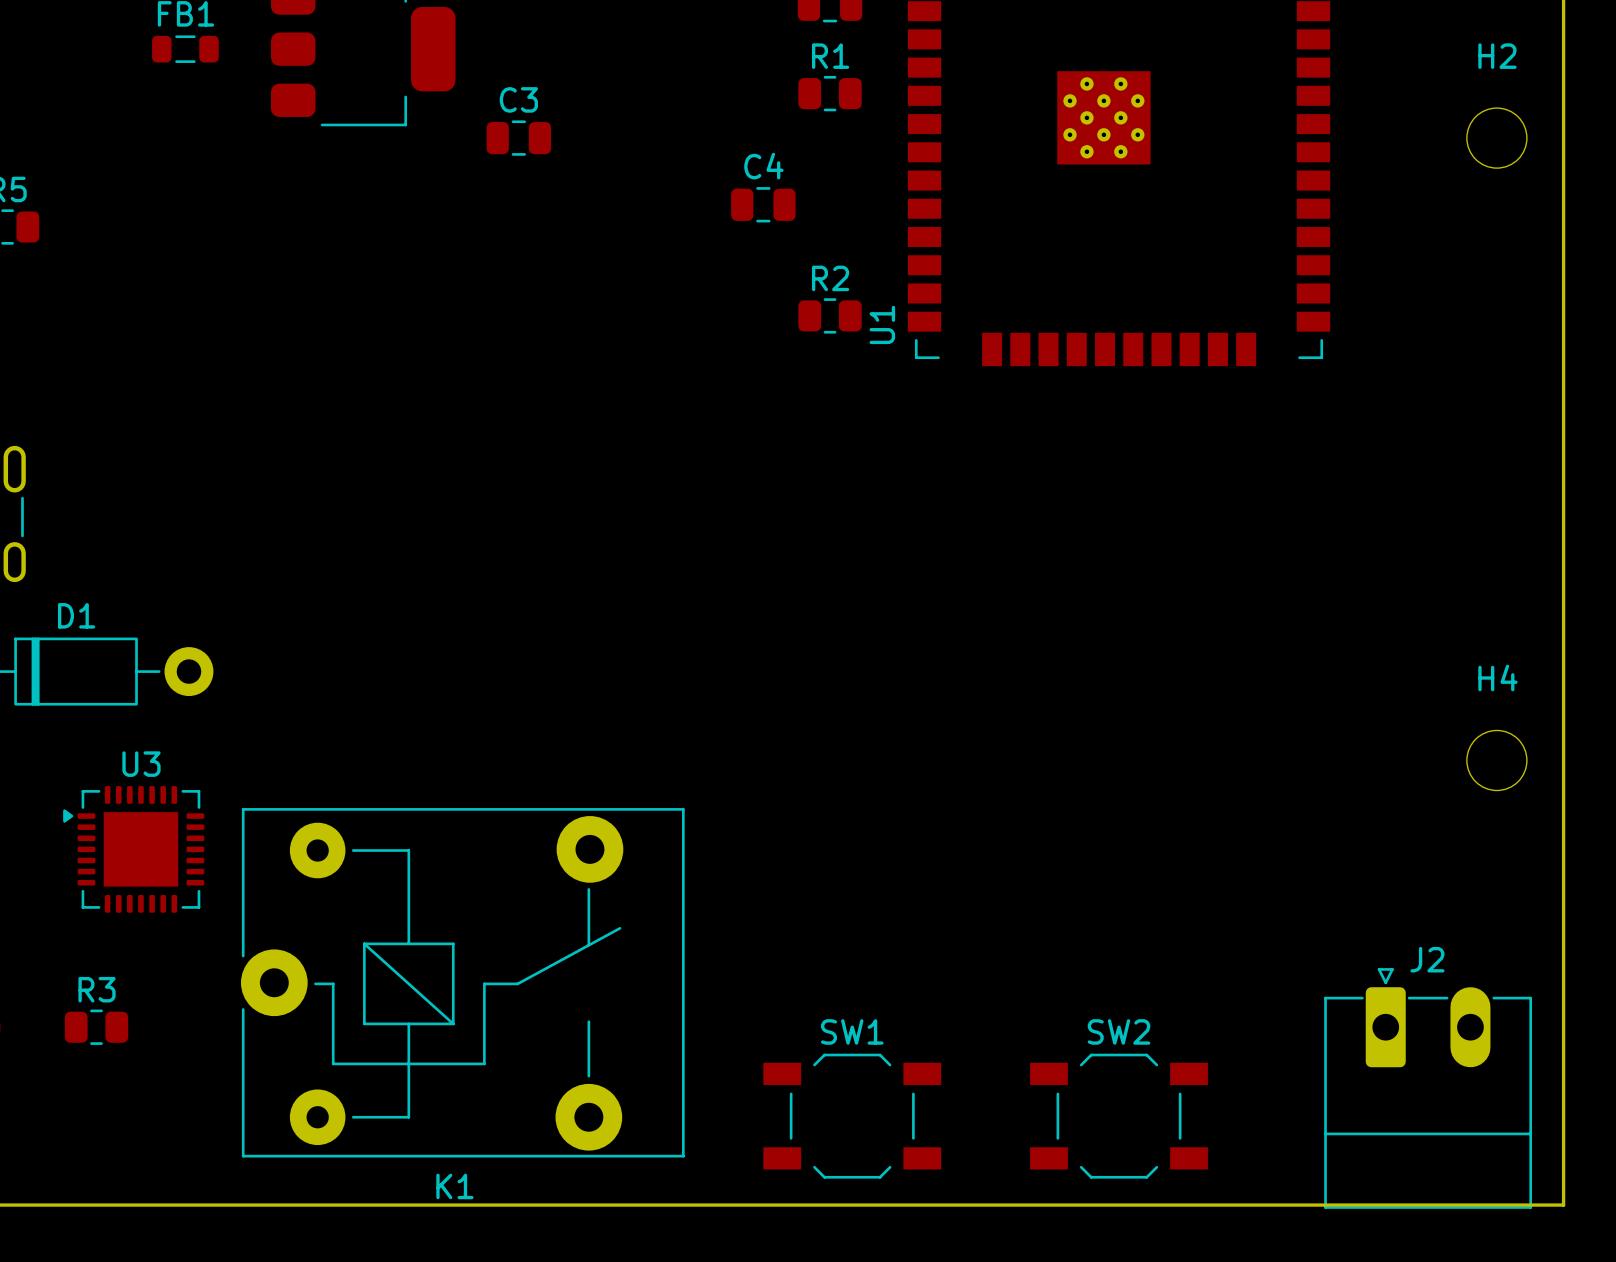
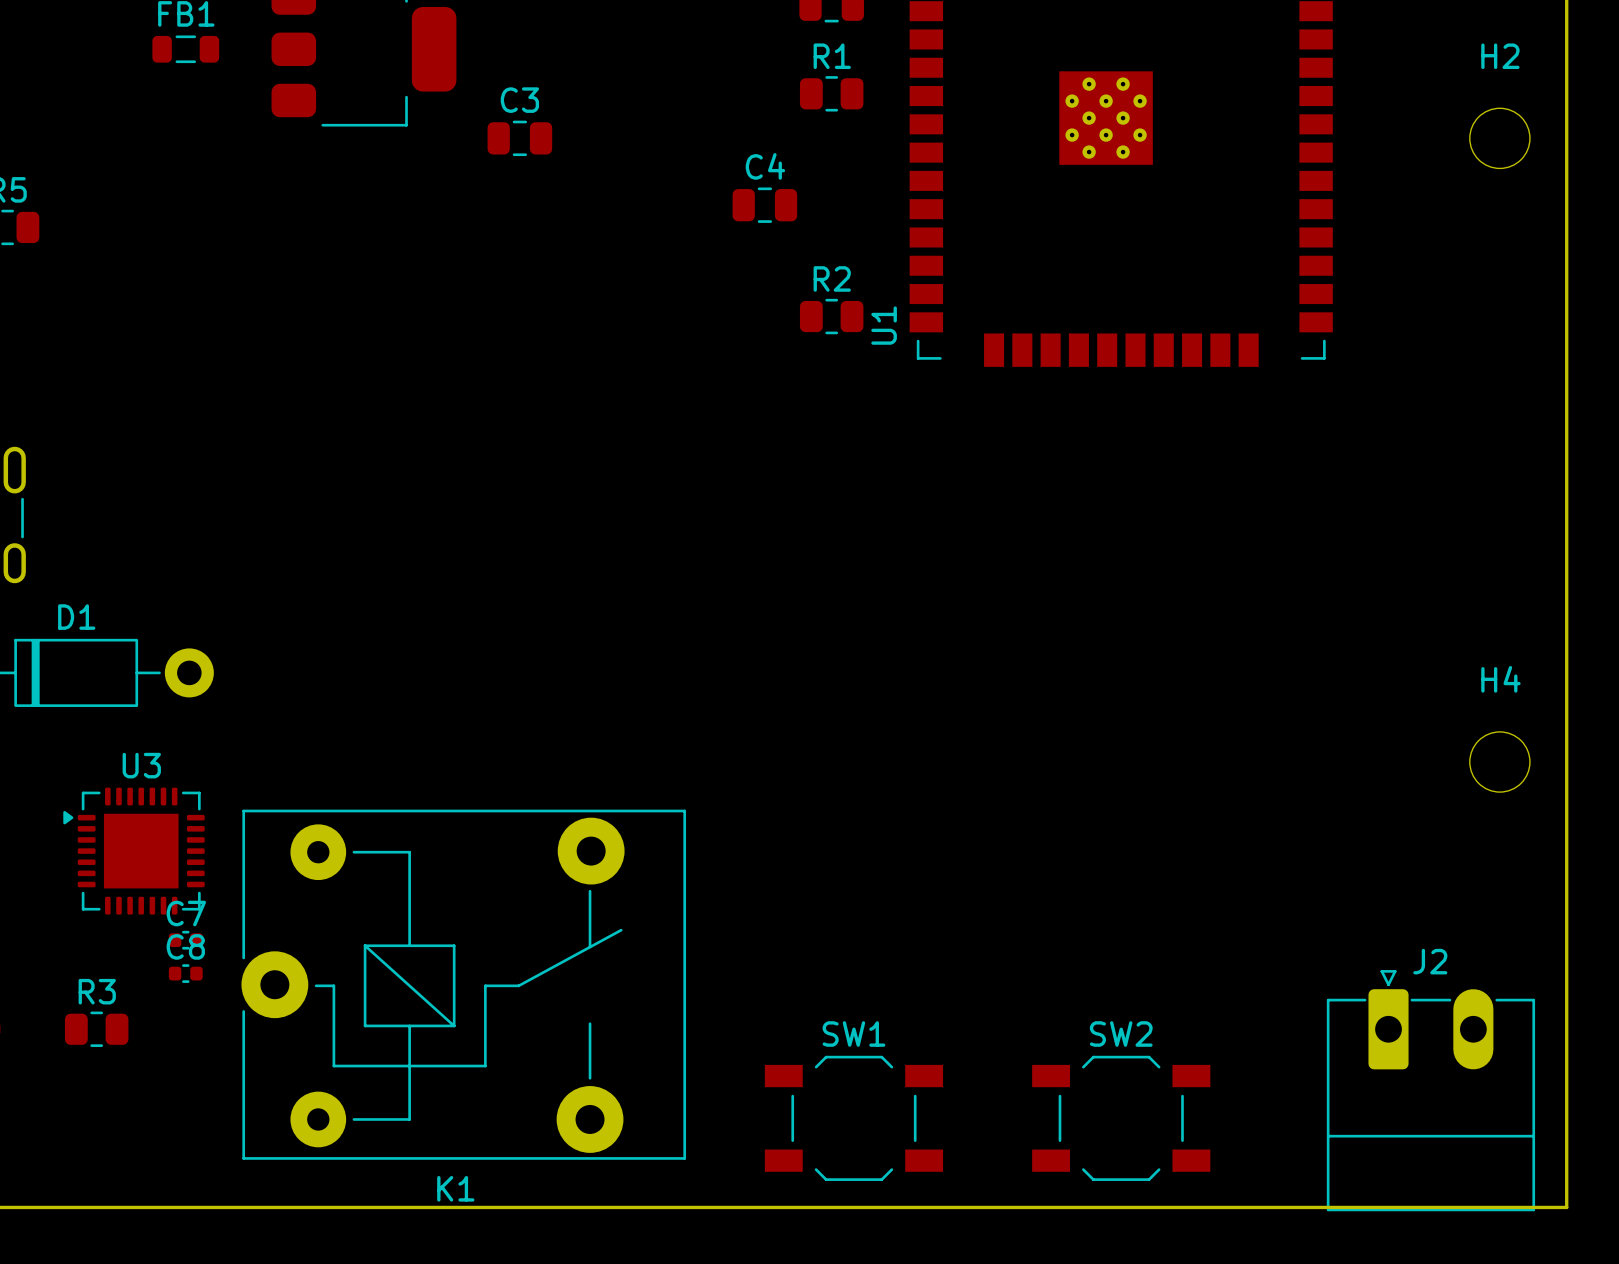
C7: none -> (185, 940)
C8: none -> (185, 973)

